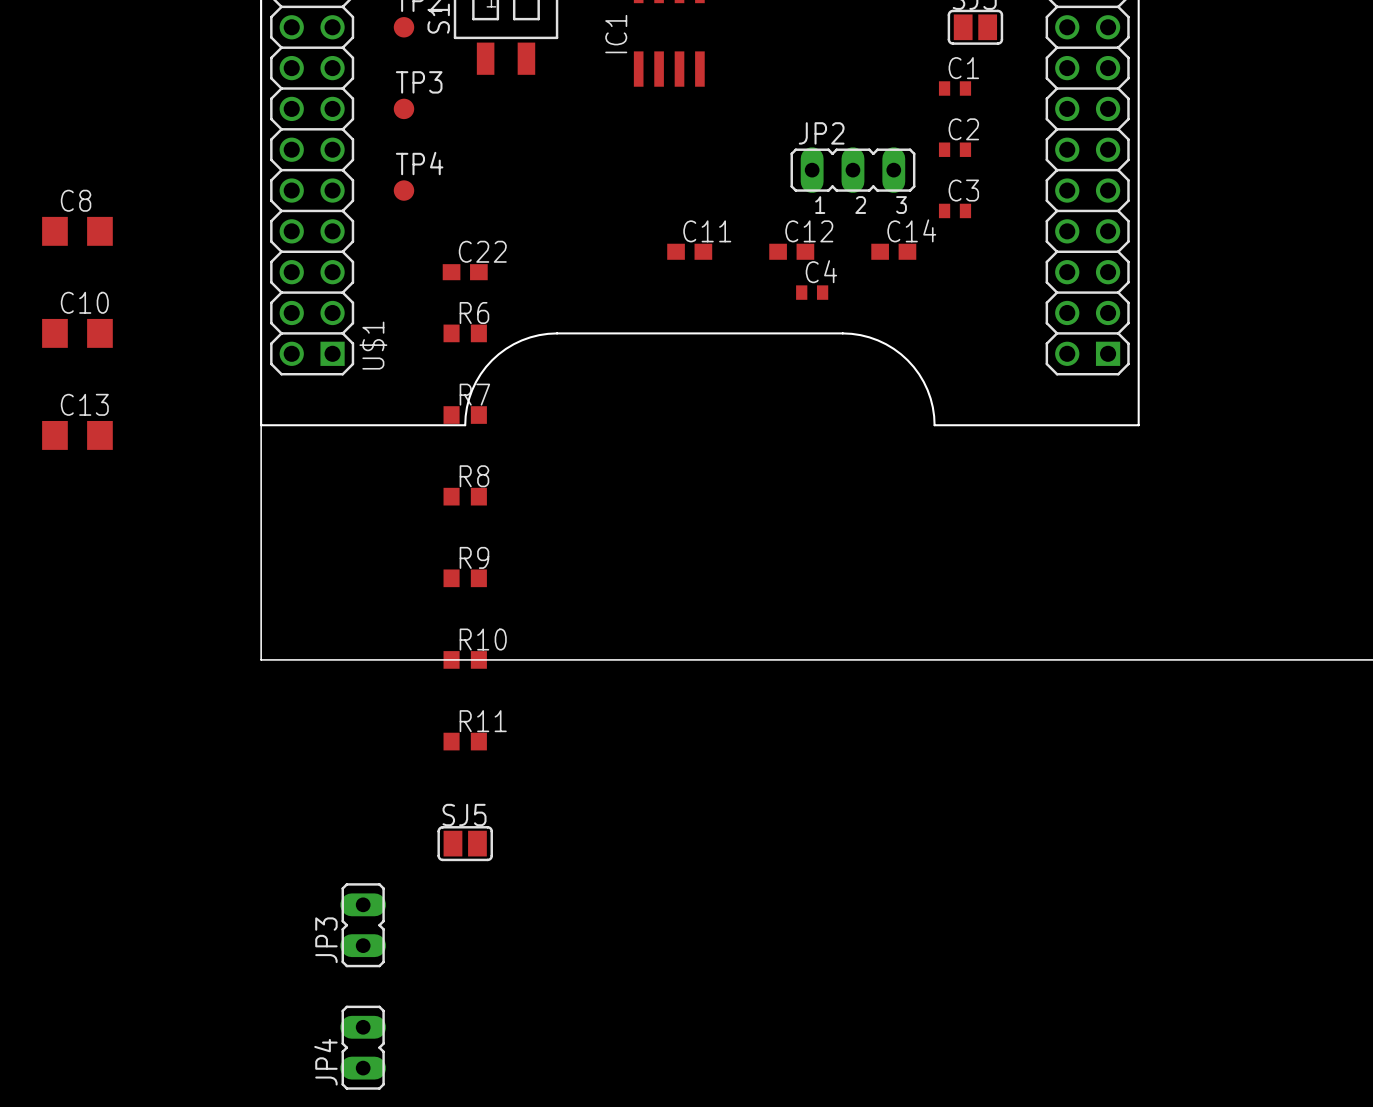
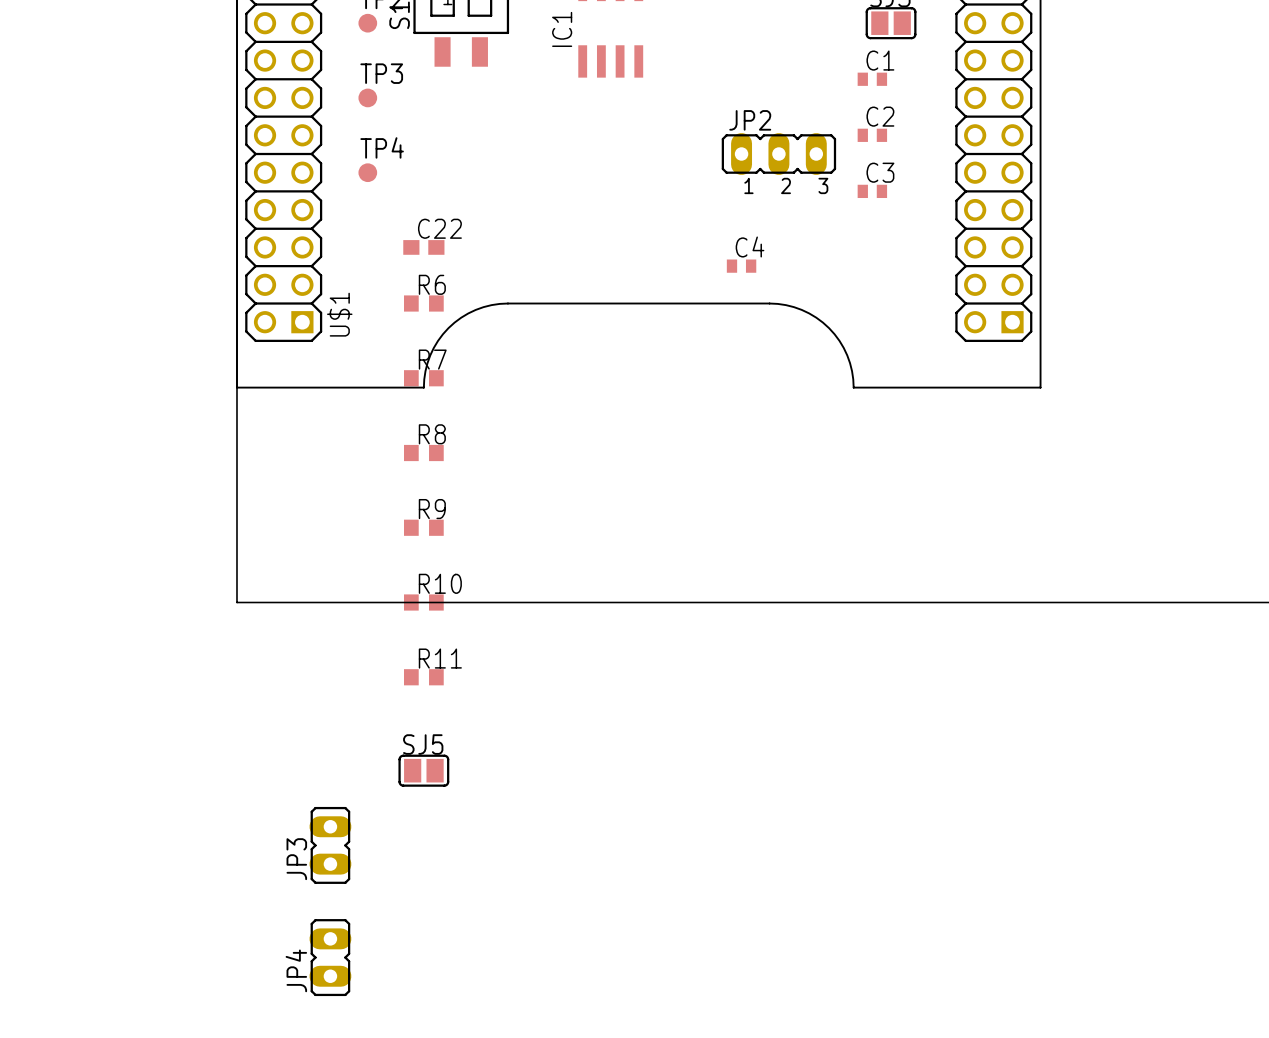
C8: (77, 231) -> none
C11: (689, 251) -> none
C12: (791, 251) -> none
C14: (893, 251) -> none
C10: (77, 333) -> none
C13: (77, 435) -> none

